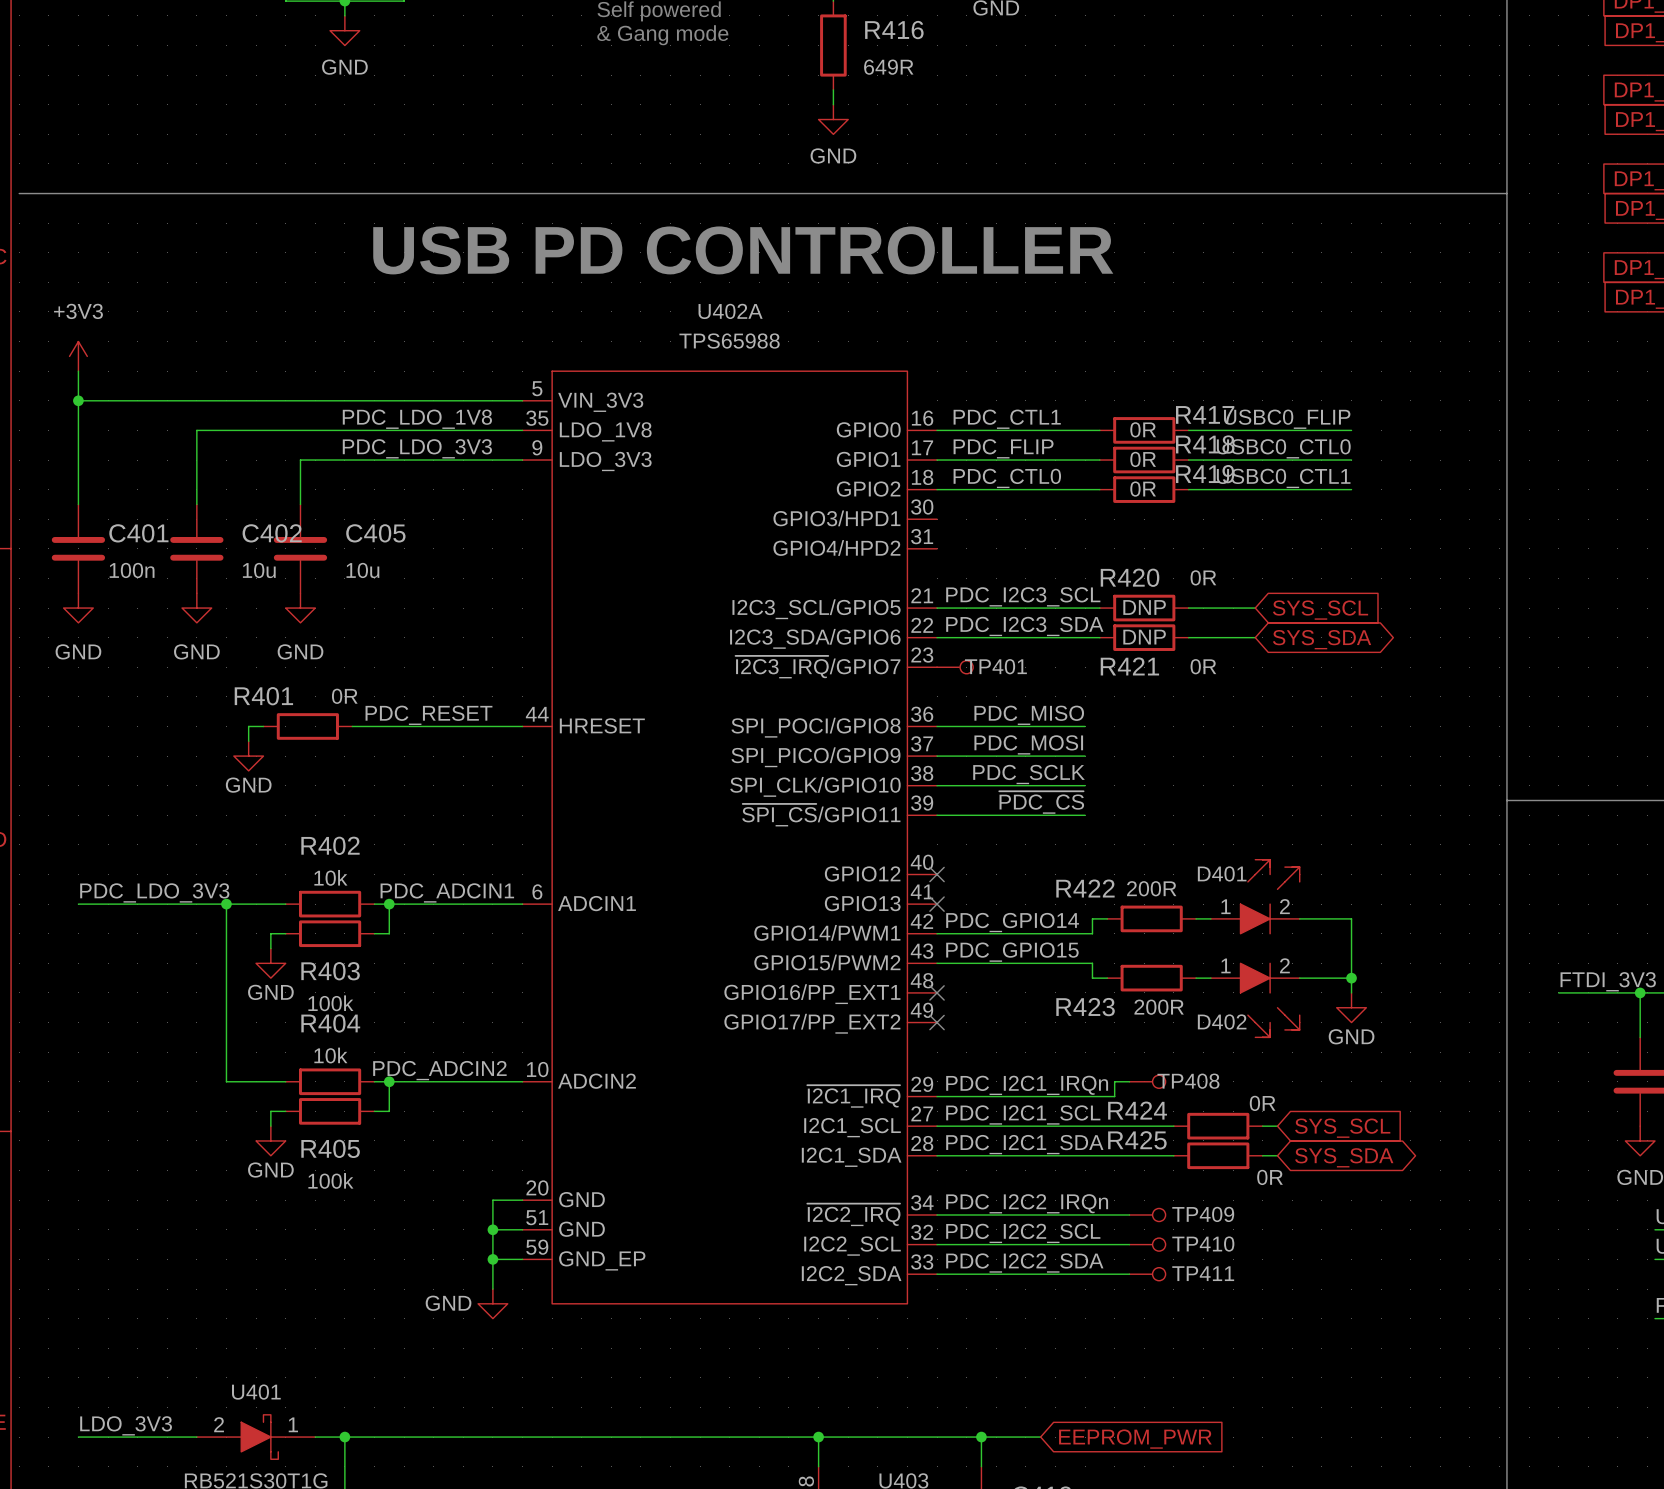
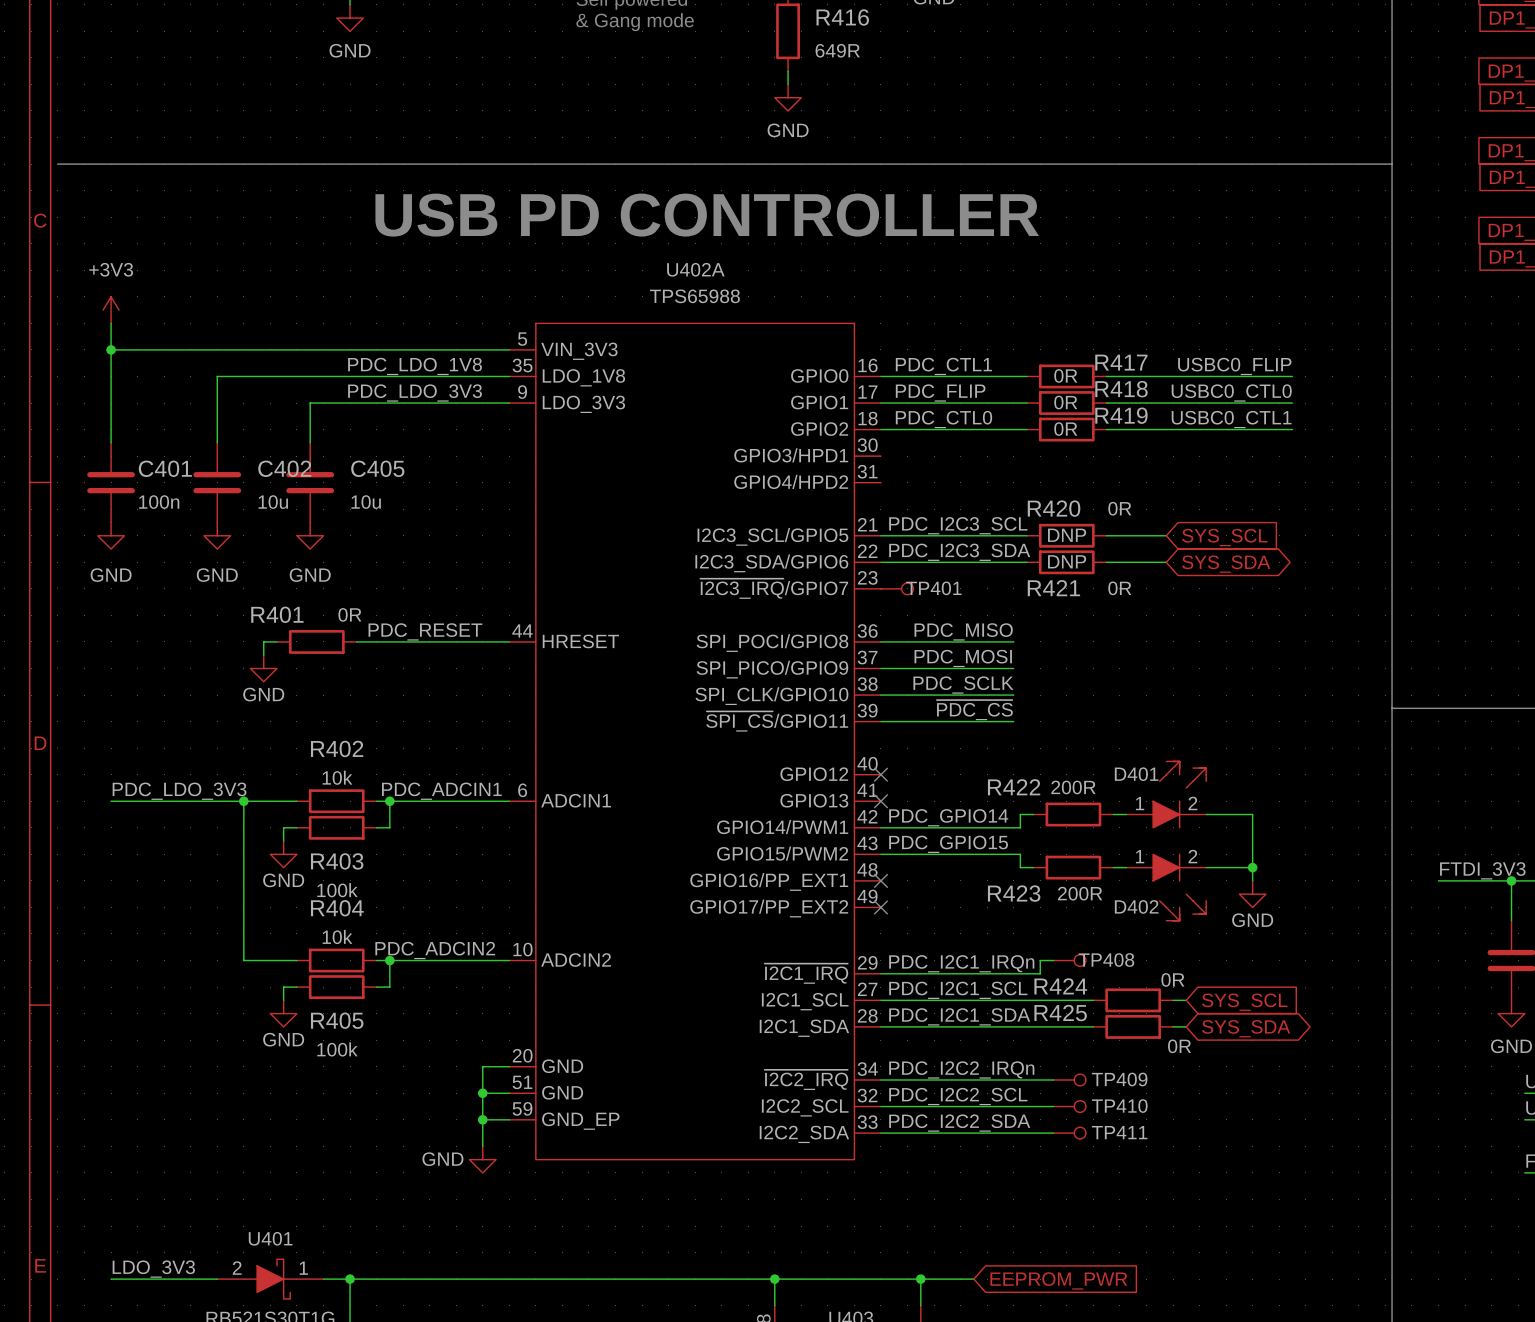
label position: USBC0_FLIP (1287, 419) -> USBC0_FLIP (1234, 366)
wire: none -> (1252, 376) (1292, 376)
label position: USBC0_CTL0 (1283, 448) -> USBC0_CTL0 (1231, 392)
wire: none -> (1252, 403) (1292, 403)
label position: USBC0_CTL1 (1283, 478) -> USBC0_CTL1 (1231, 419)
wire: none -> (1252, 429) (1292, 429)

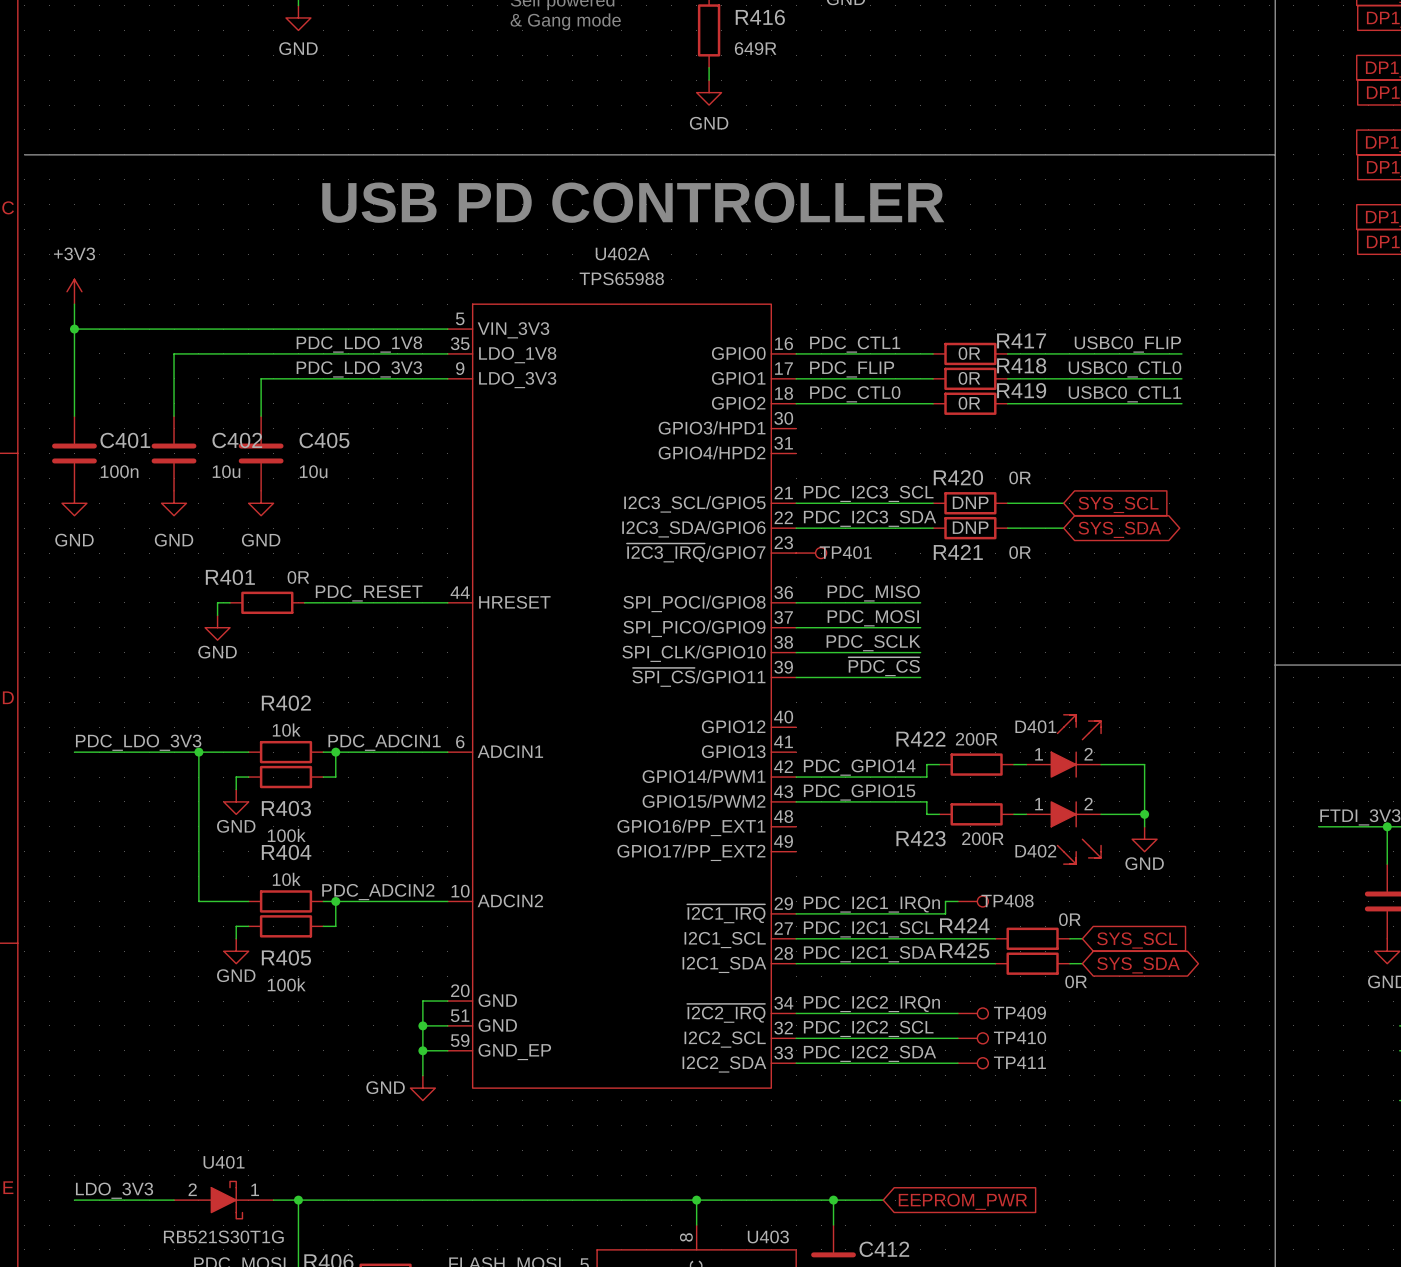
no-connect mark: (880, 774) -> none
no-connect mark: (880, 801) -> none
no-connect mark: (880, 880) -> none
no-connect mark: (880, 907) -> none

